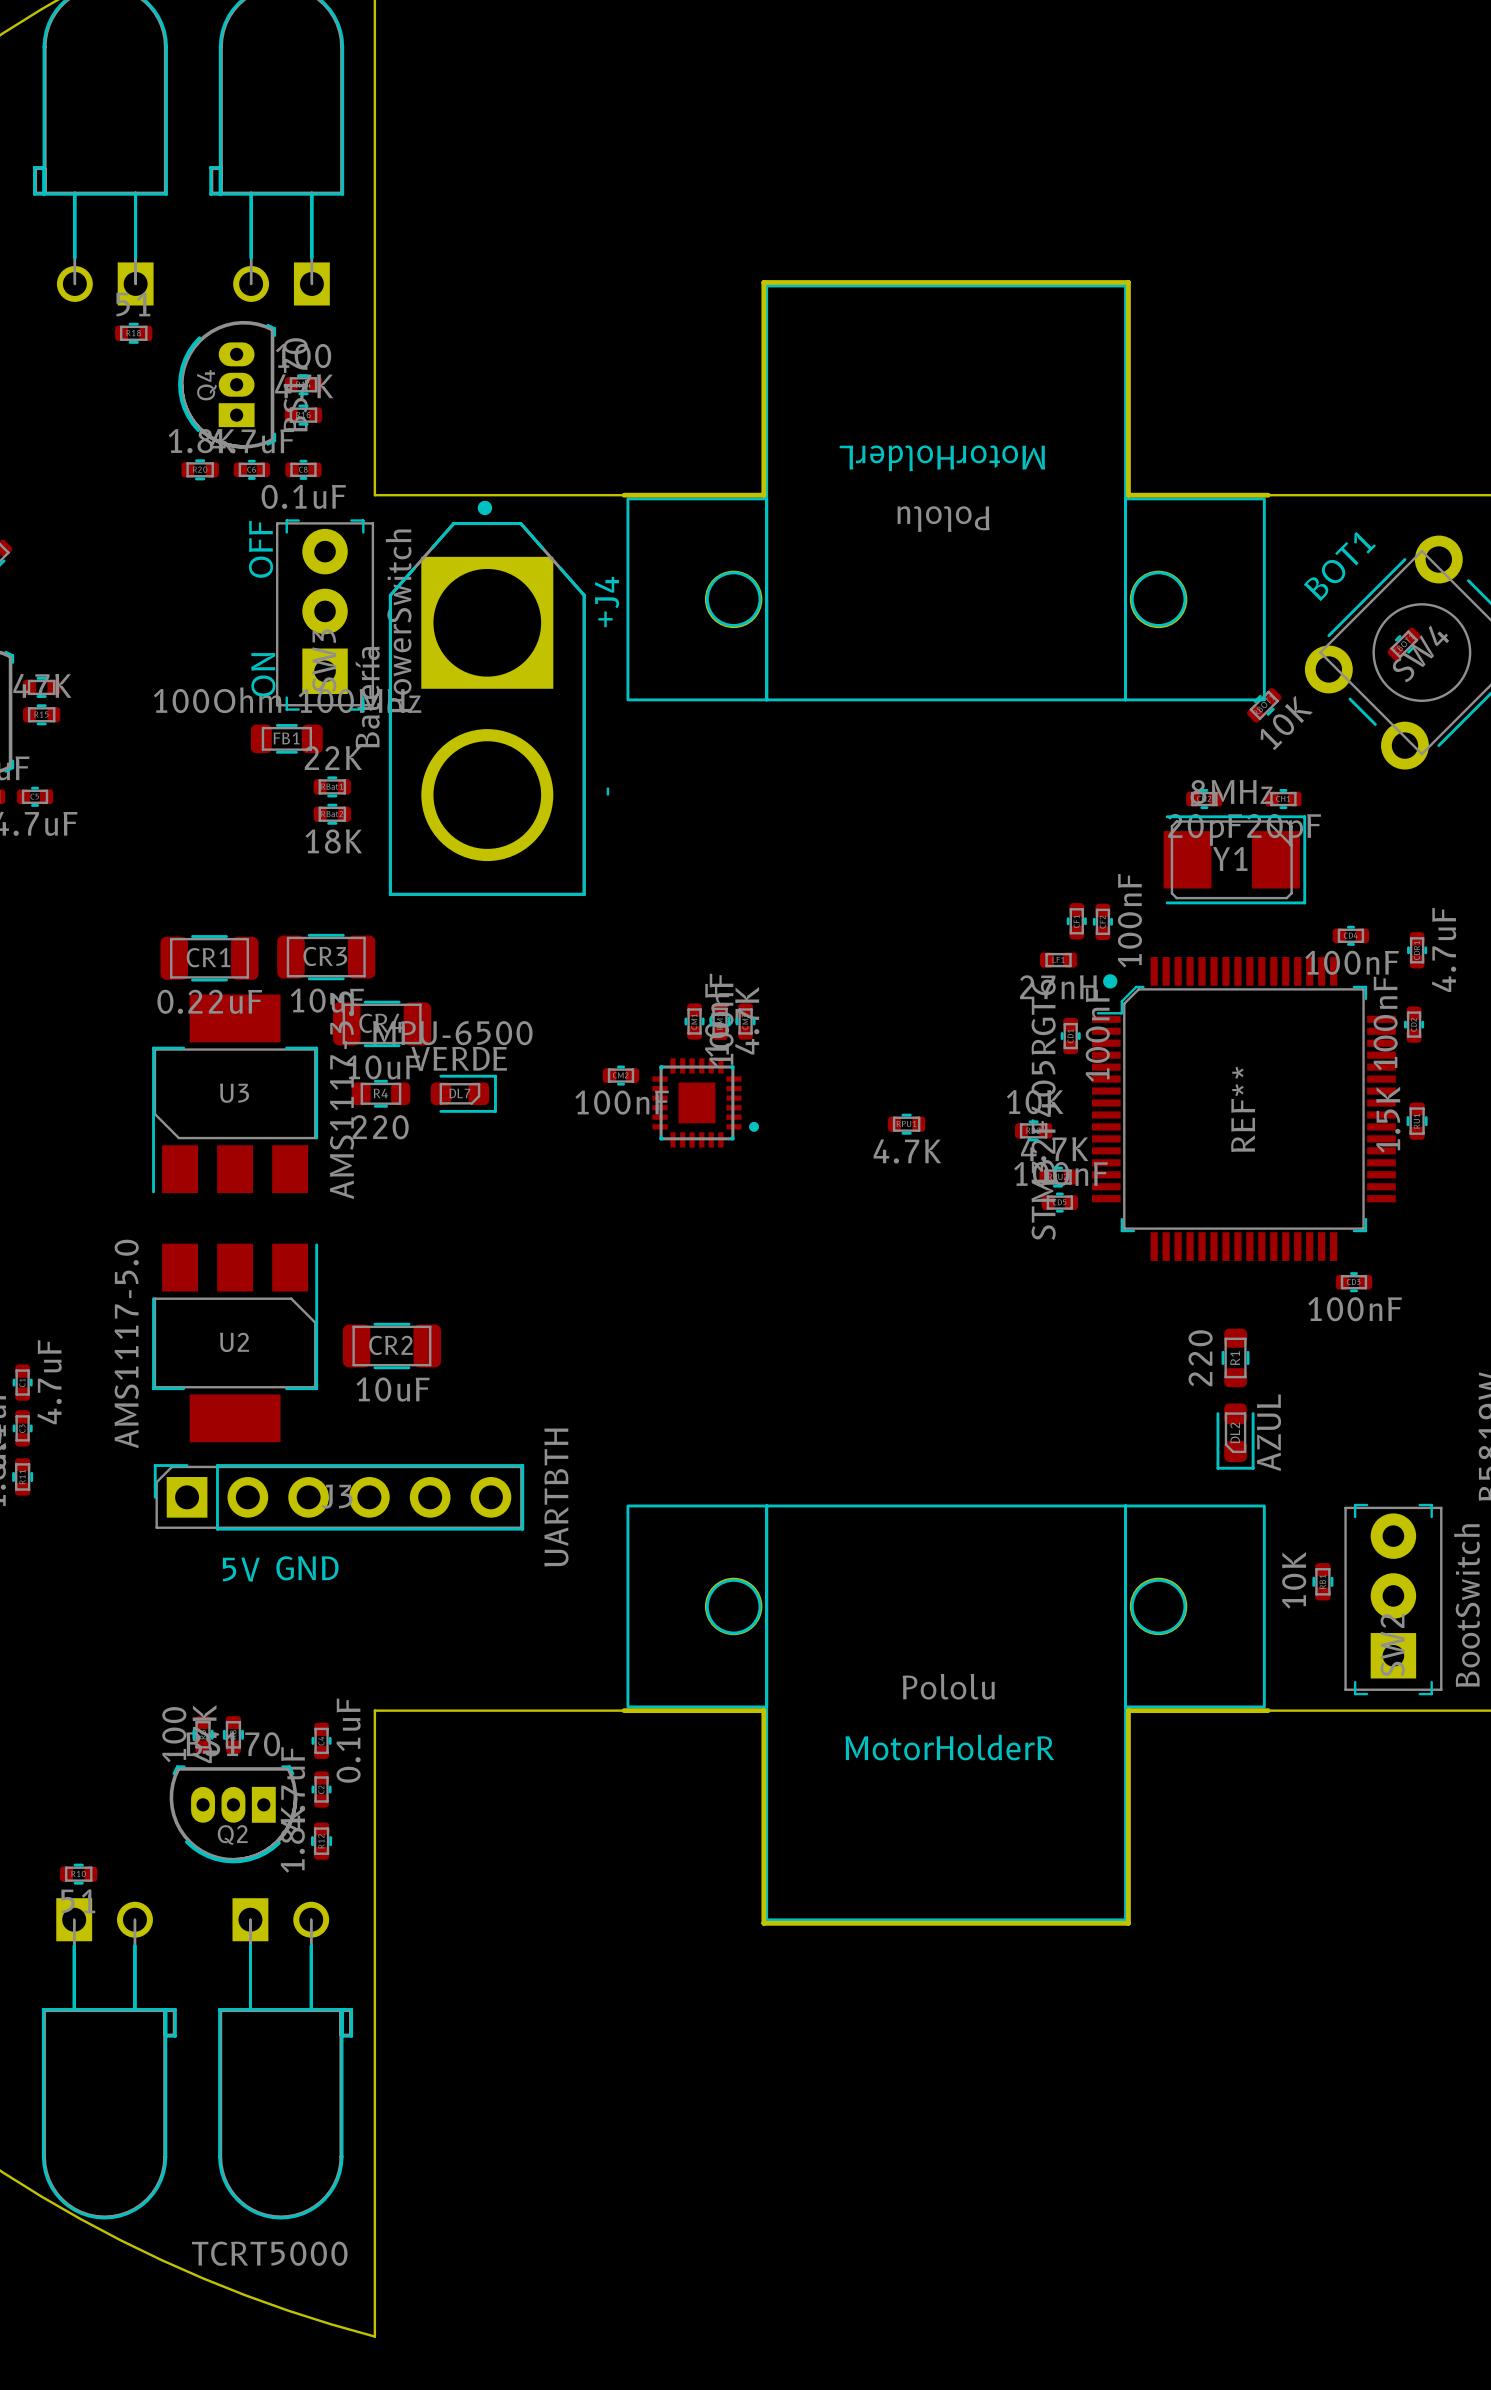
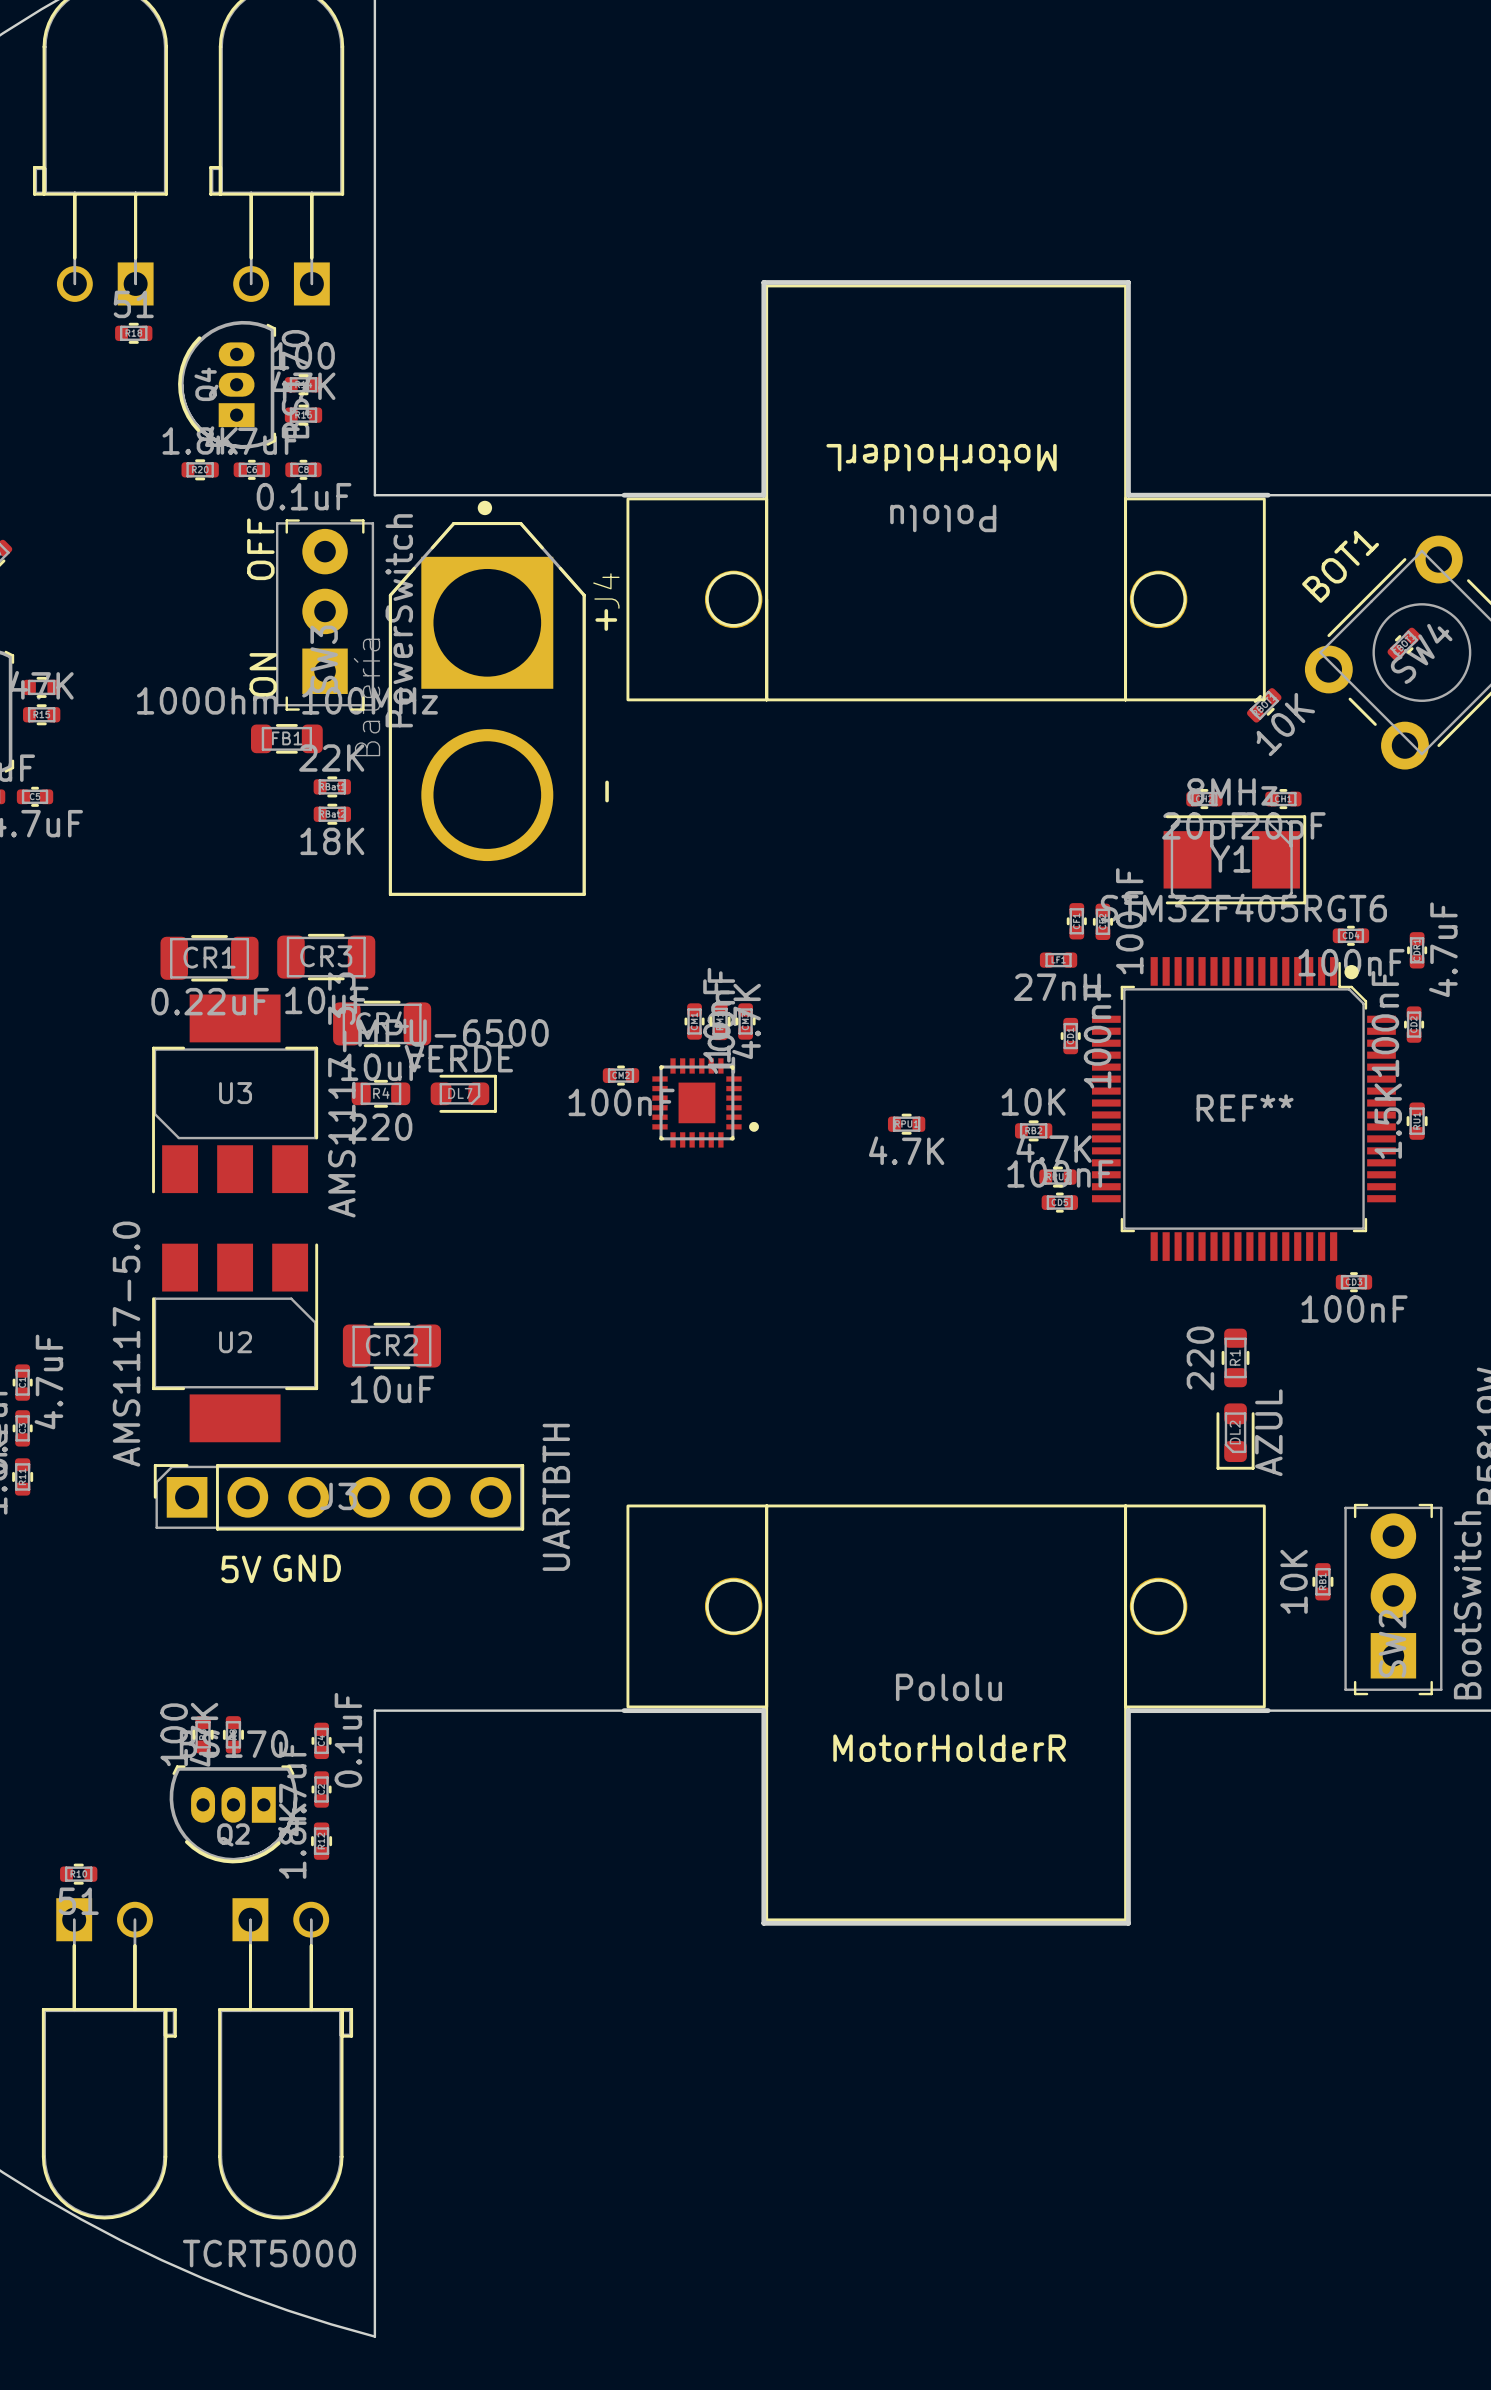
drawing position: (1110, 981) -> (1351, 972)
part rotation: 0° (1243, 1108) -> 90° clockwise (1243, 1108)

